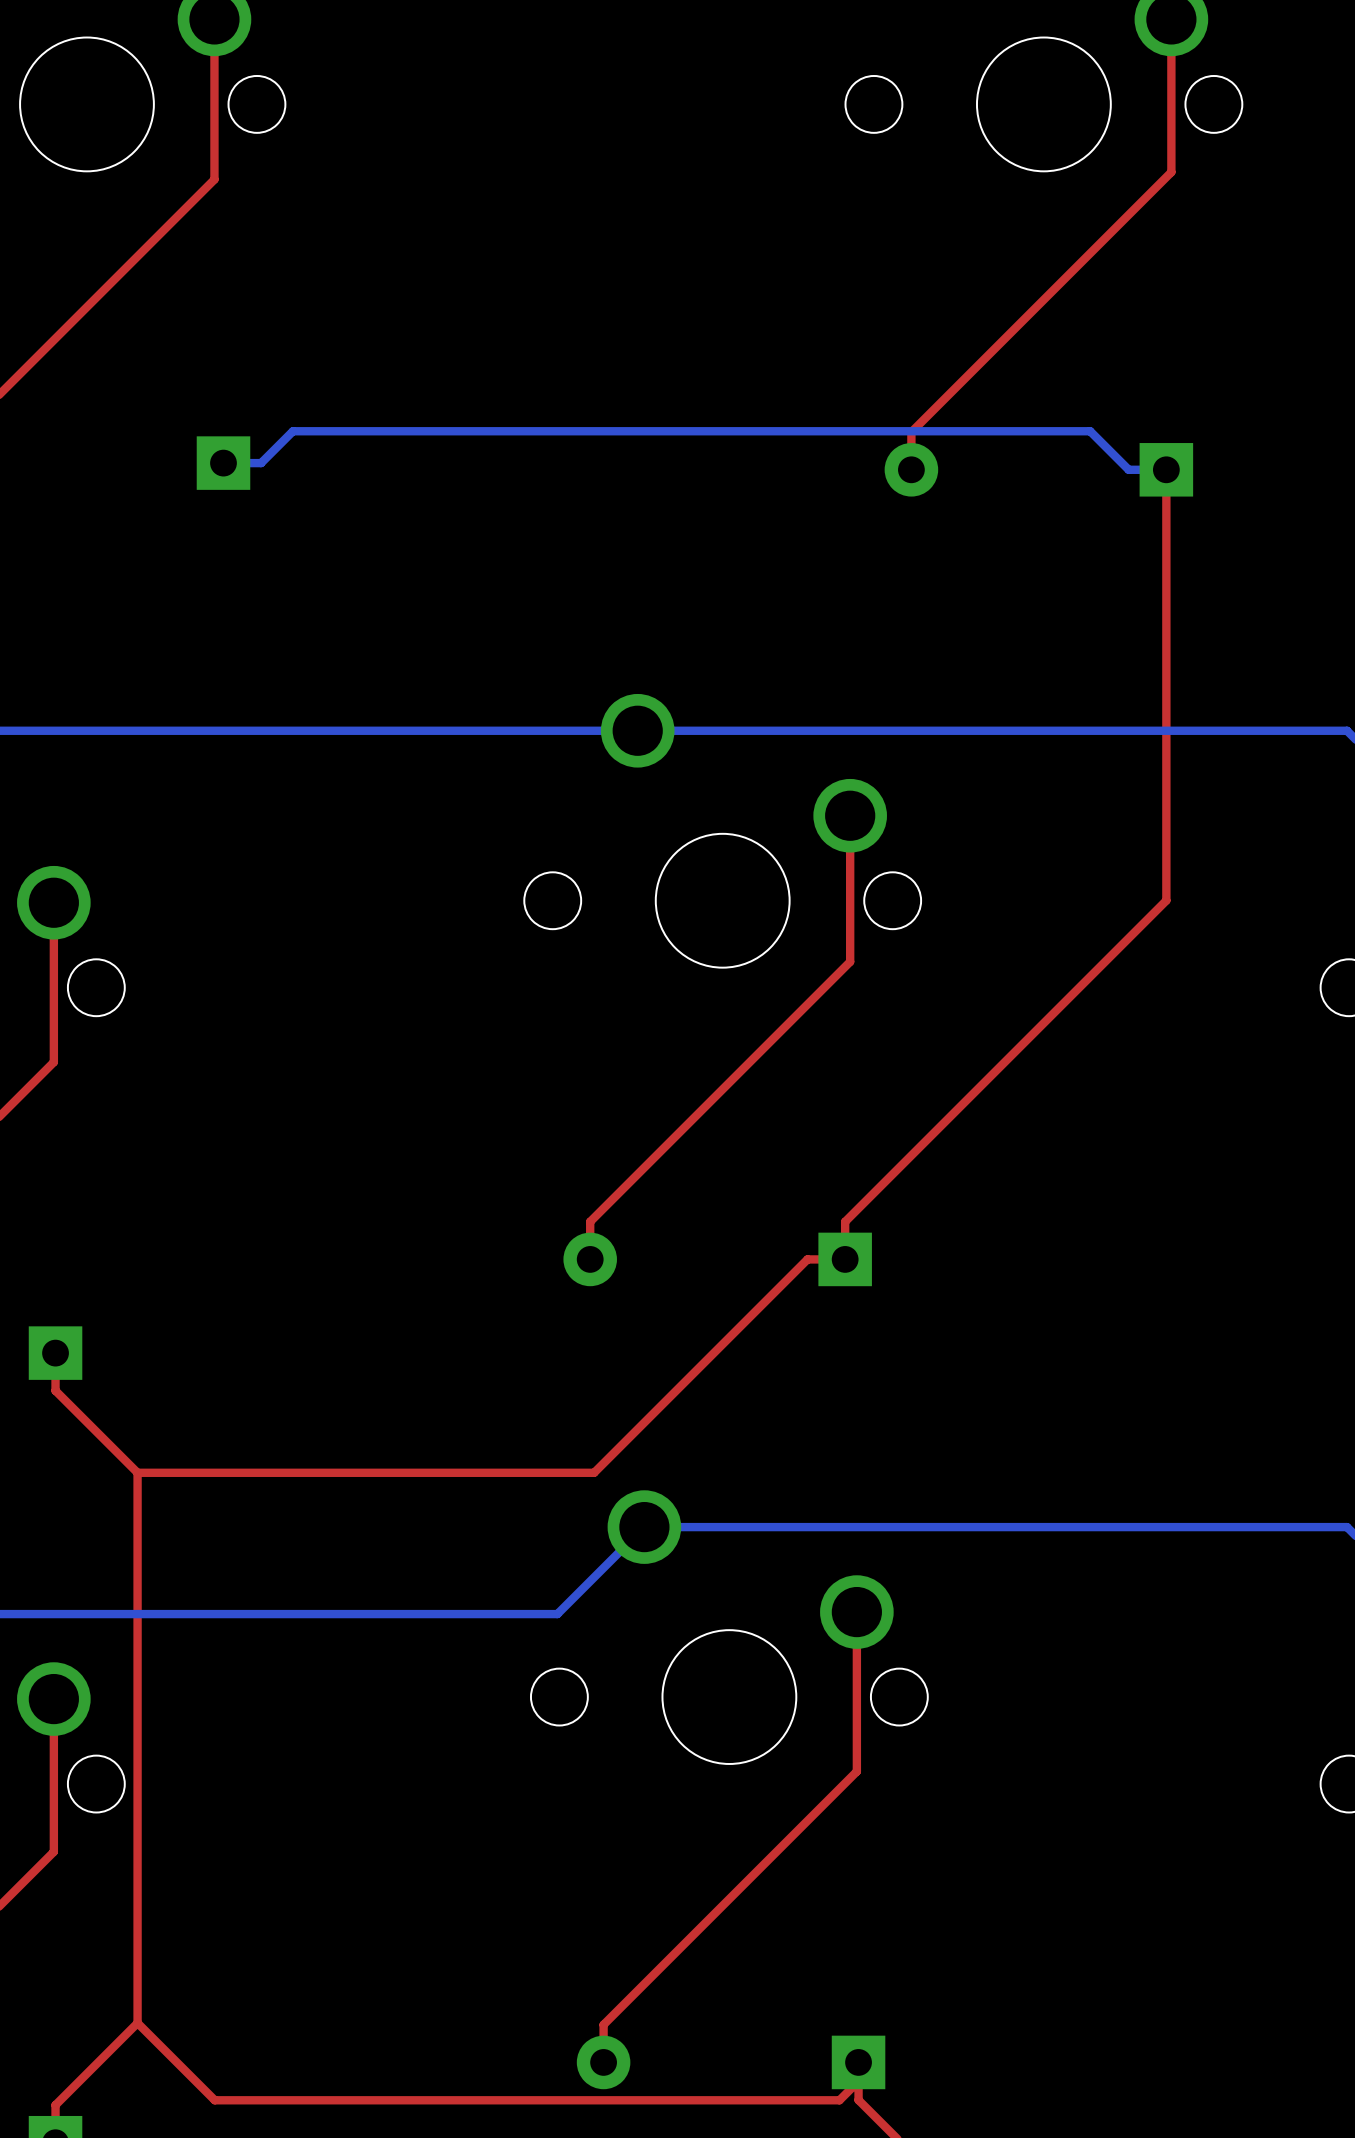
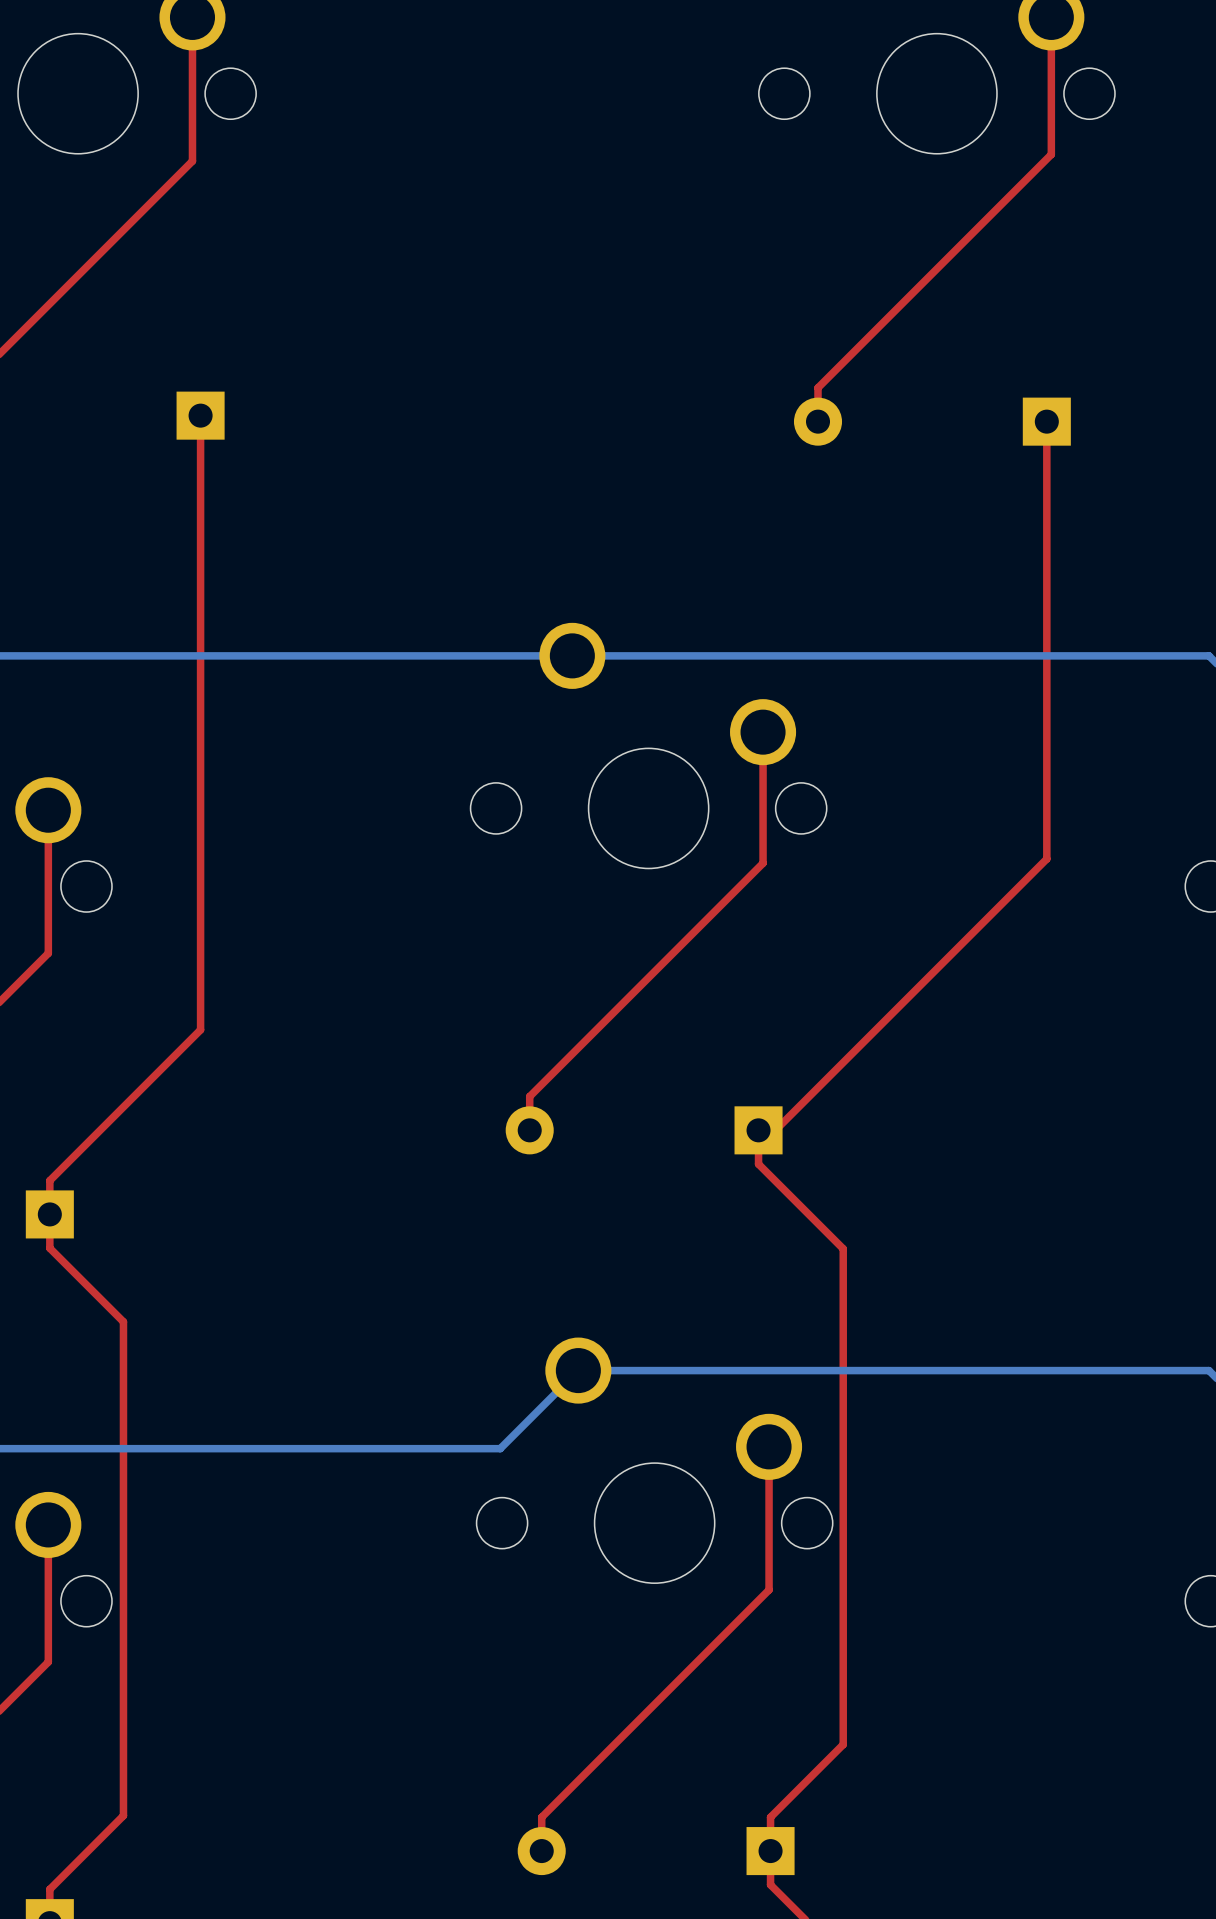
top track: none -> (200, 415) (200, 1029) (49, 1180) (49, 1214)
bottom track: (223, 463) (261, 463) (293, 431) (1090, 431) (1128, 469) (1166, 469) -> none
top track: (1166, 900) (845, 1221) (845, 1259) (807, 1259) (594, 1472) (137, 1472) -> (1046, 808) (1046, 858) (758, 1147)
top track: none -> (758, 1130) (758, 1164) (843, 1248) (843, 1744) (770, 1817) (770, 1851)
top track: (137, 2023) (214, 2100) (839, 2100) (858, 2081) -> none

